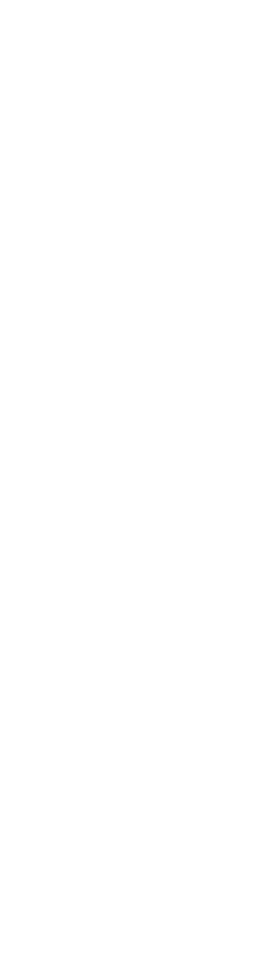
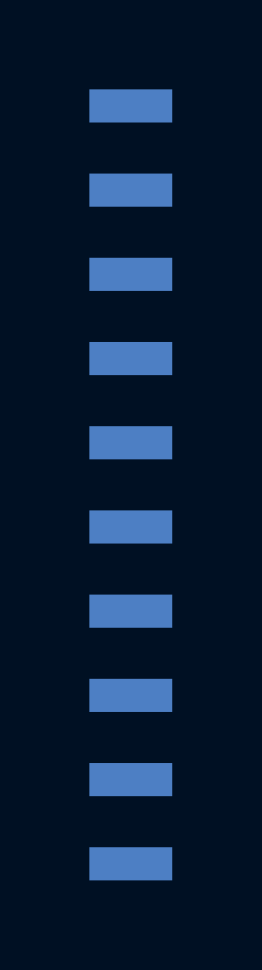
part: none -> (130, 484)

